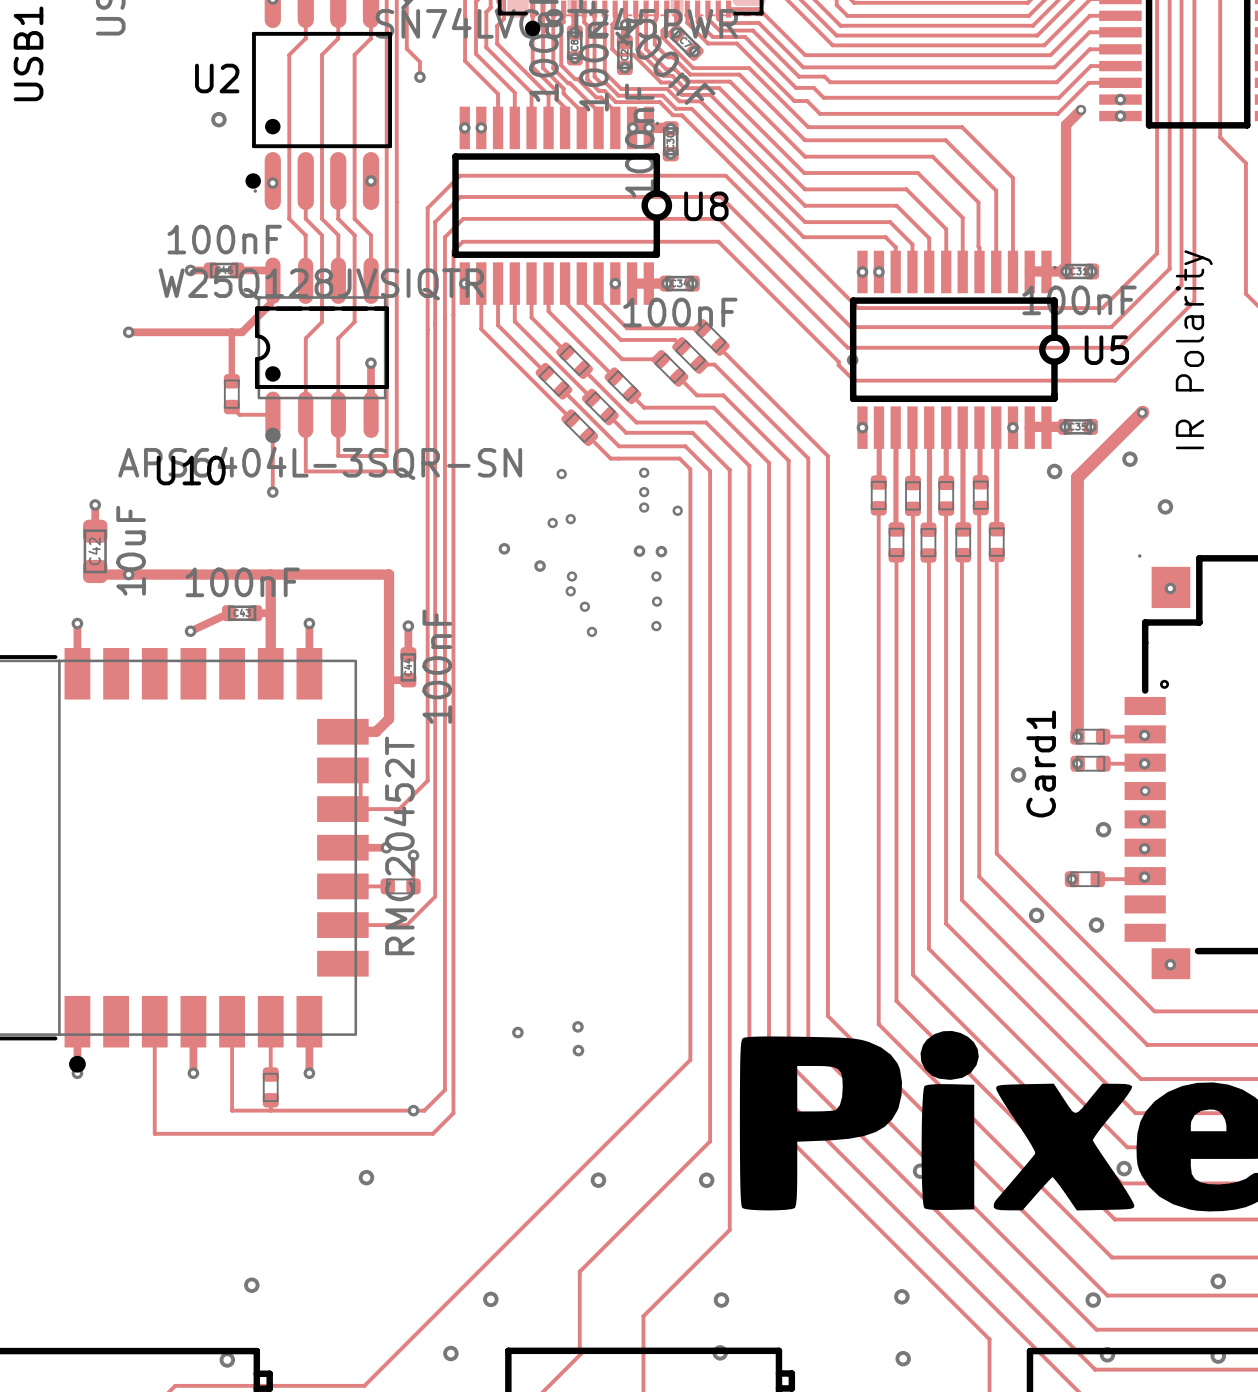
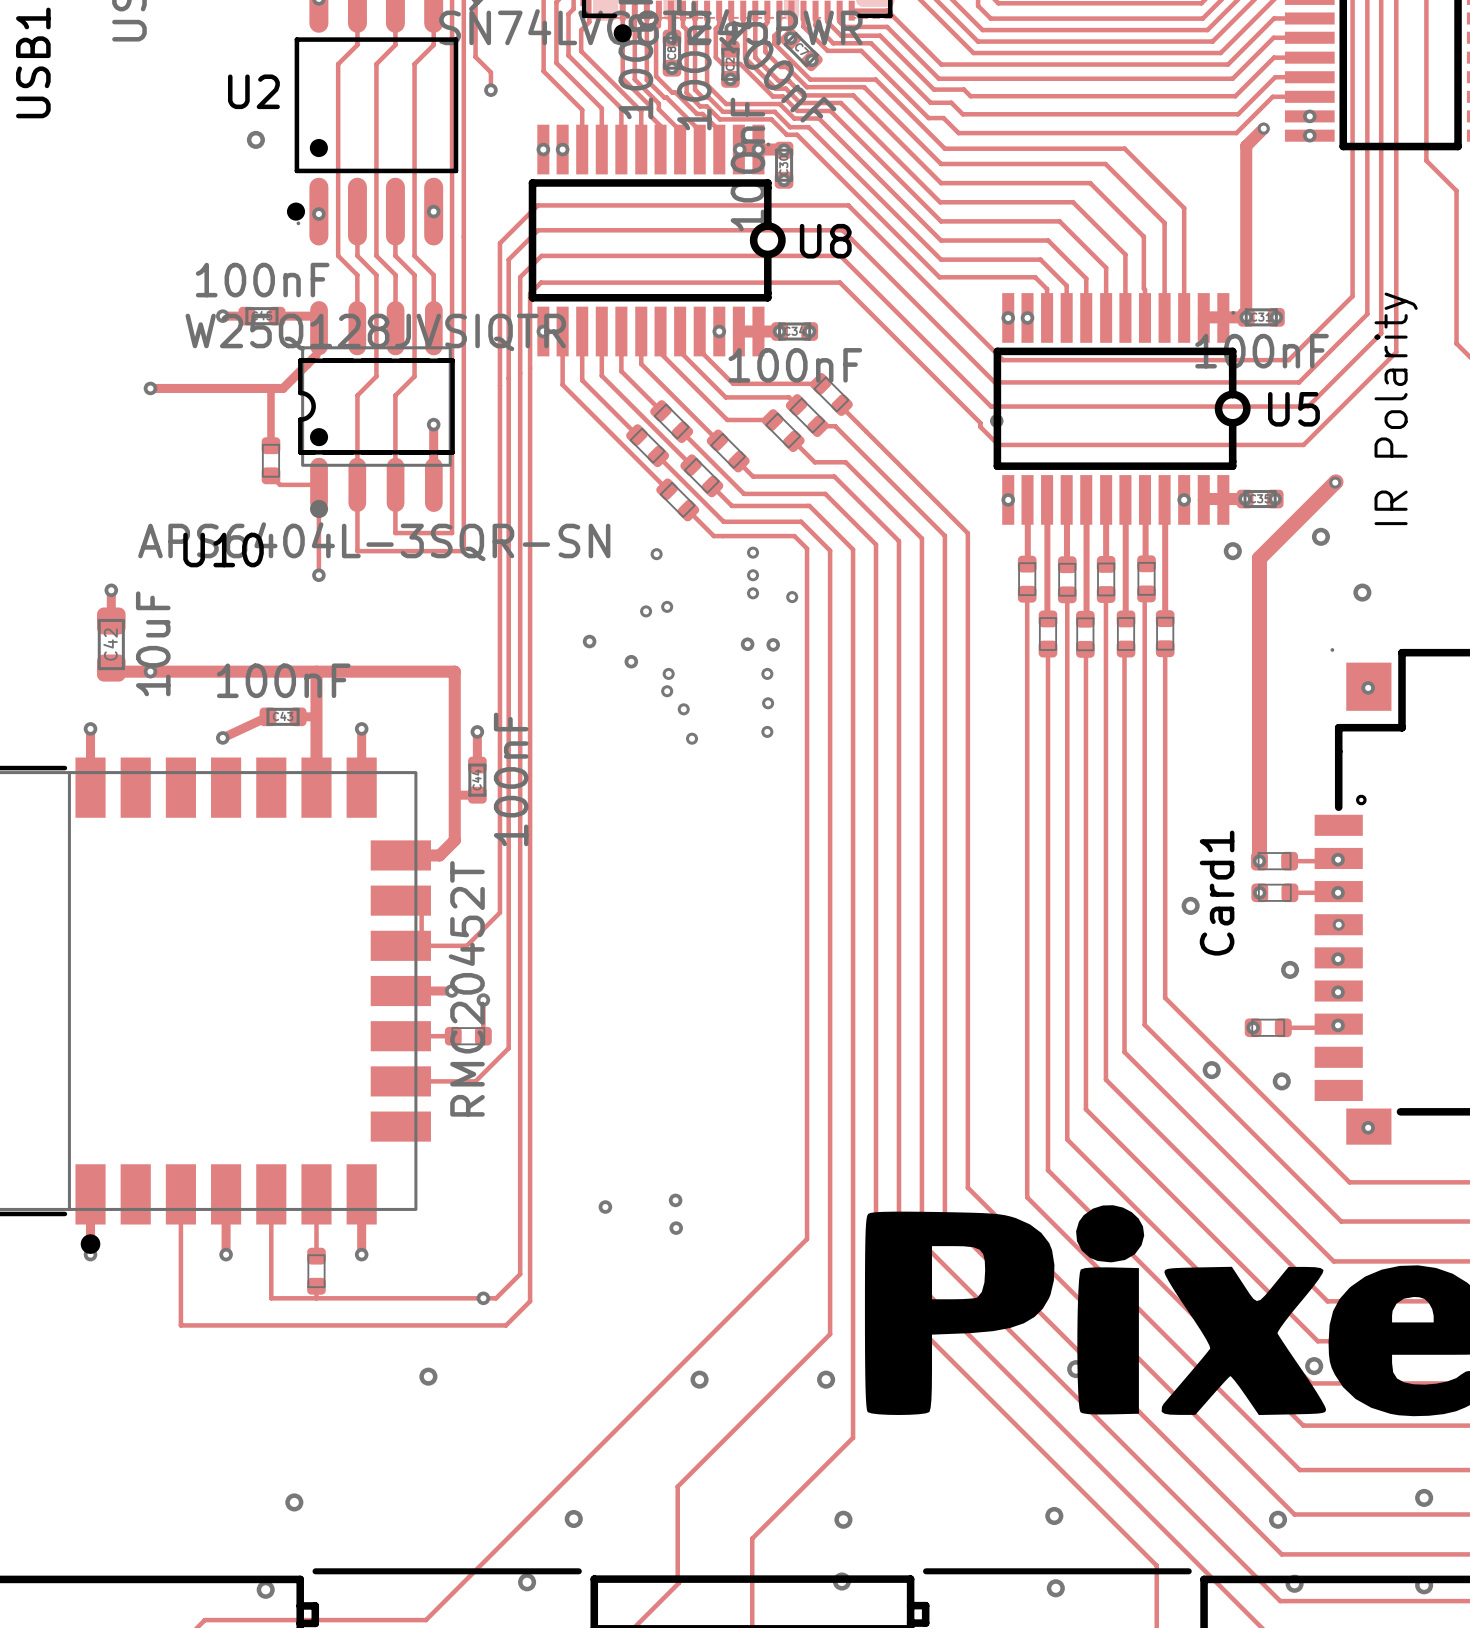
line: none -> (315, 1571) (578, 1571)
line: none -> (926, 1571) (1188, 1571)

